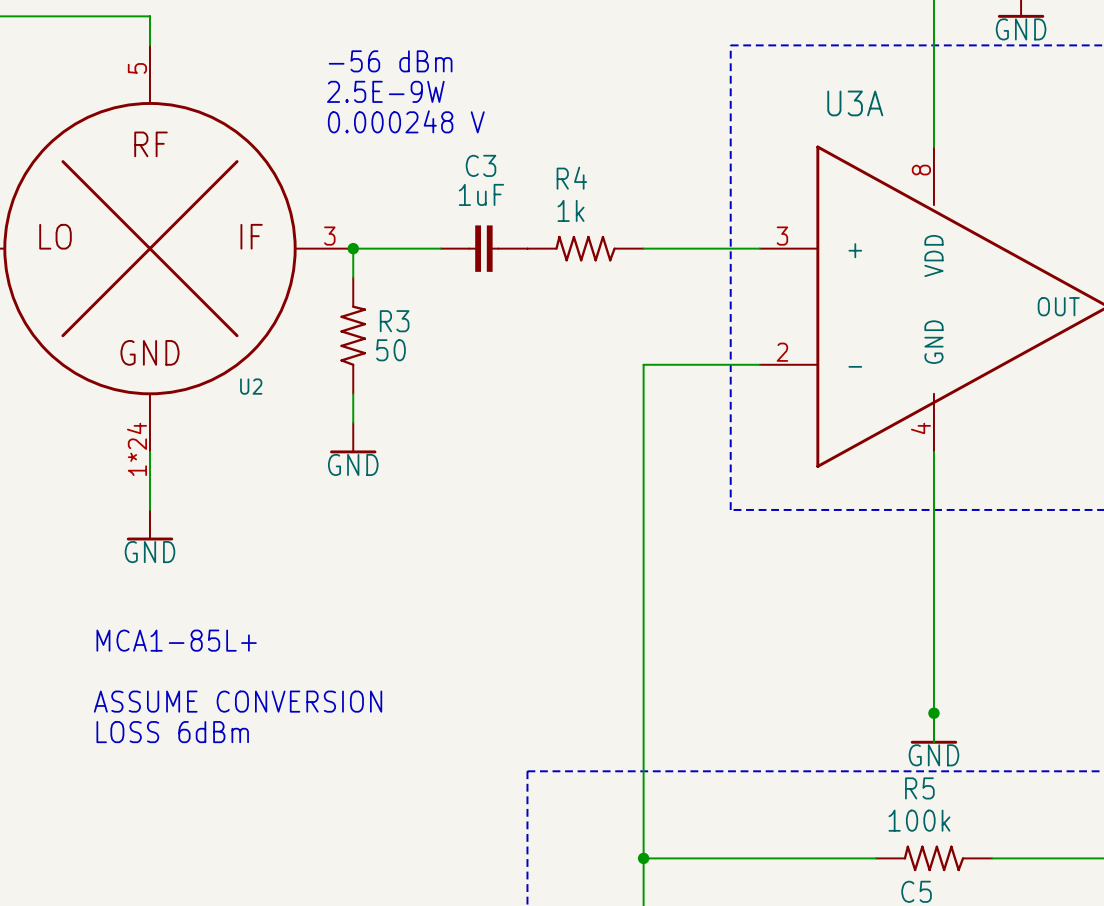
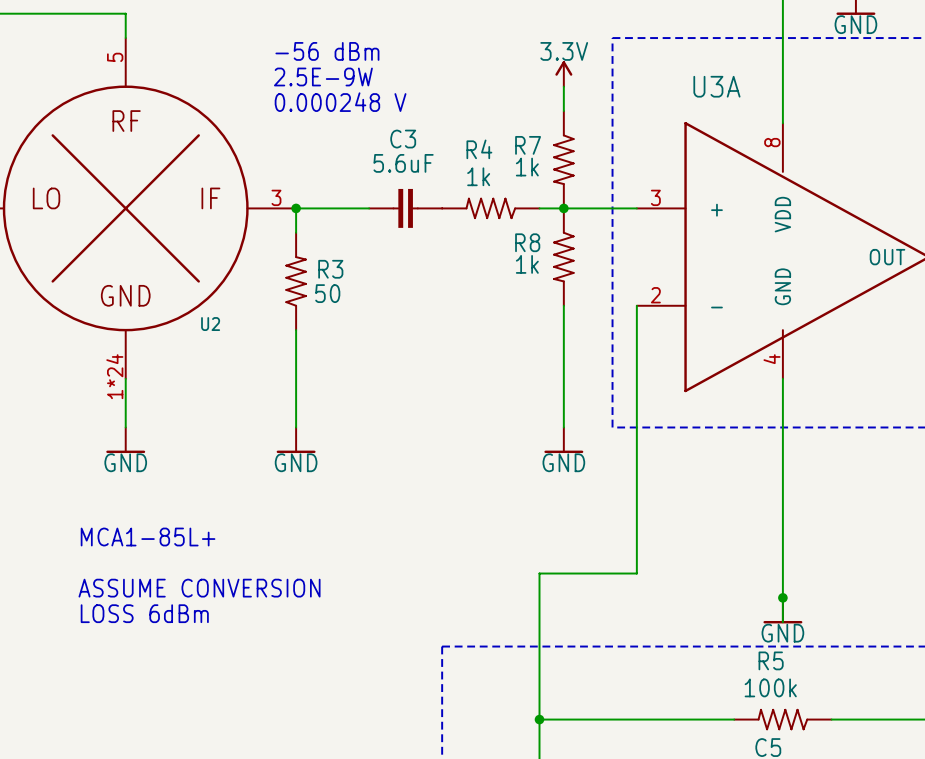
power symbol: none -> 3.3V (563, 73)
wire: none -> (563, 86) (563, 111)
R7: none -> 1k (563, 159)
C3 value: 1uF (481, 194) -> 5.6uF (403, 163)
junction: none -> (563, 208)
R8: none -> 1k (563, 257)
wire: none -> (563, 305) (563, 427)
wire: (759, 364) (643, 364) (643, 684) -> (636, 305) (636, 573) (539, 573)
wire: none -> (296, 354) (296, 427)
power symbol position: GND (353, 438) -> GND (296, 440)
power symbol: none -> GND (563, 440)

